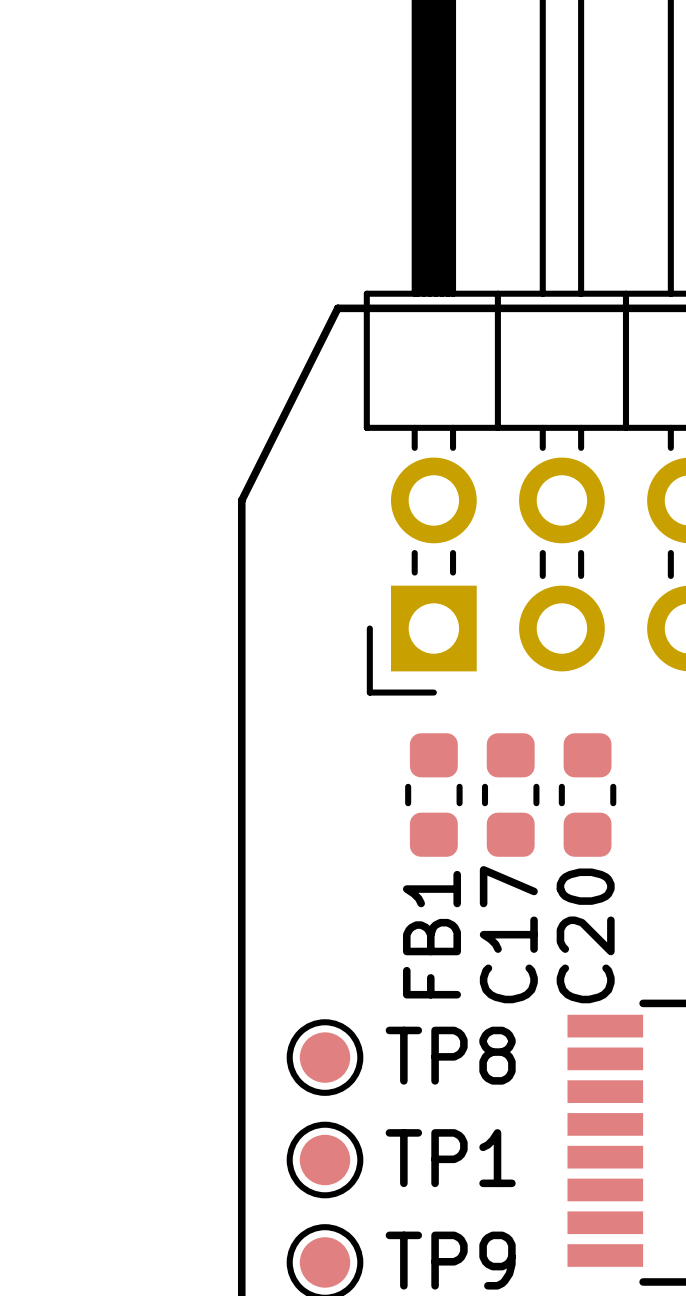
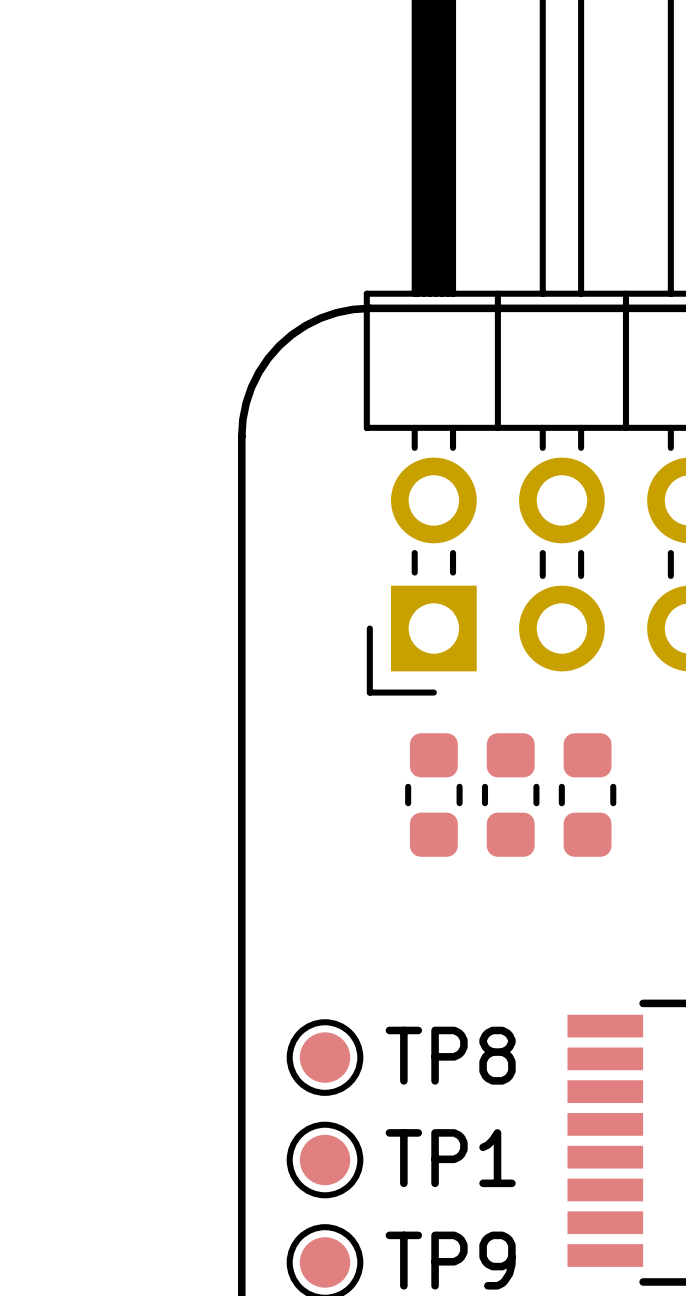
board edge: (369, 308) (337, 308) (241, 500) -> (369, 308) (336, 312) (305, 325) (279, 345) (258, 372) (246, 403) (242, 419) (241, 500)
FB1 name: FB1 (431, 934) -> none
C17 name: C17 (508, 934) -> none
C20 name: C20 (585, 935) -> none

